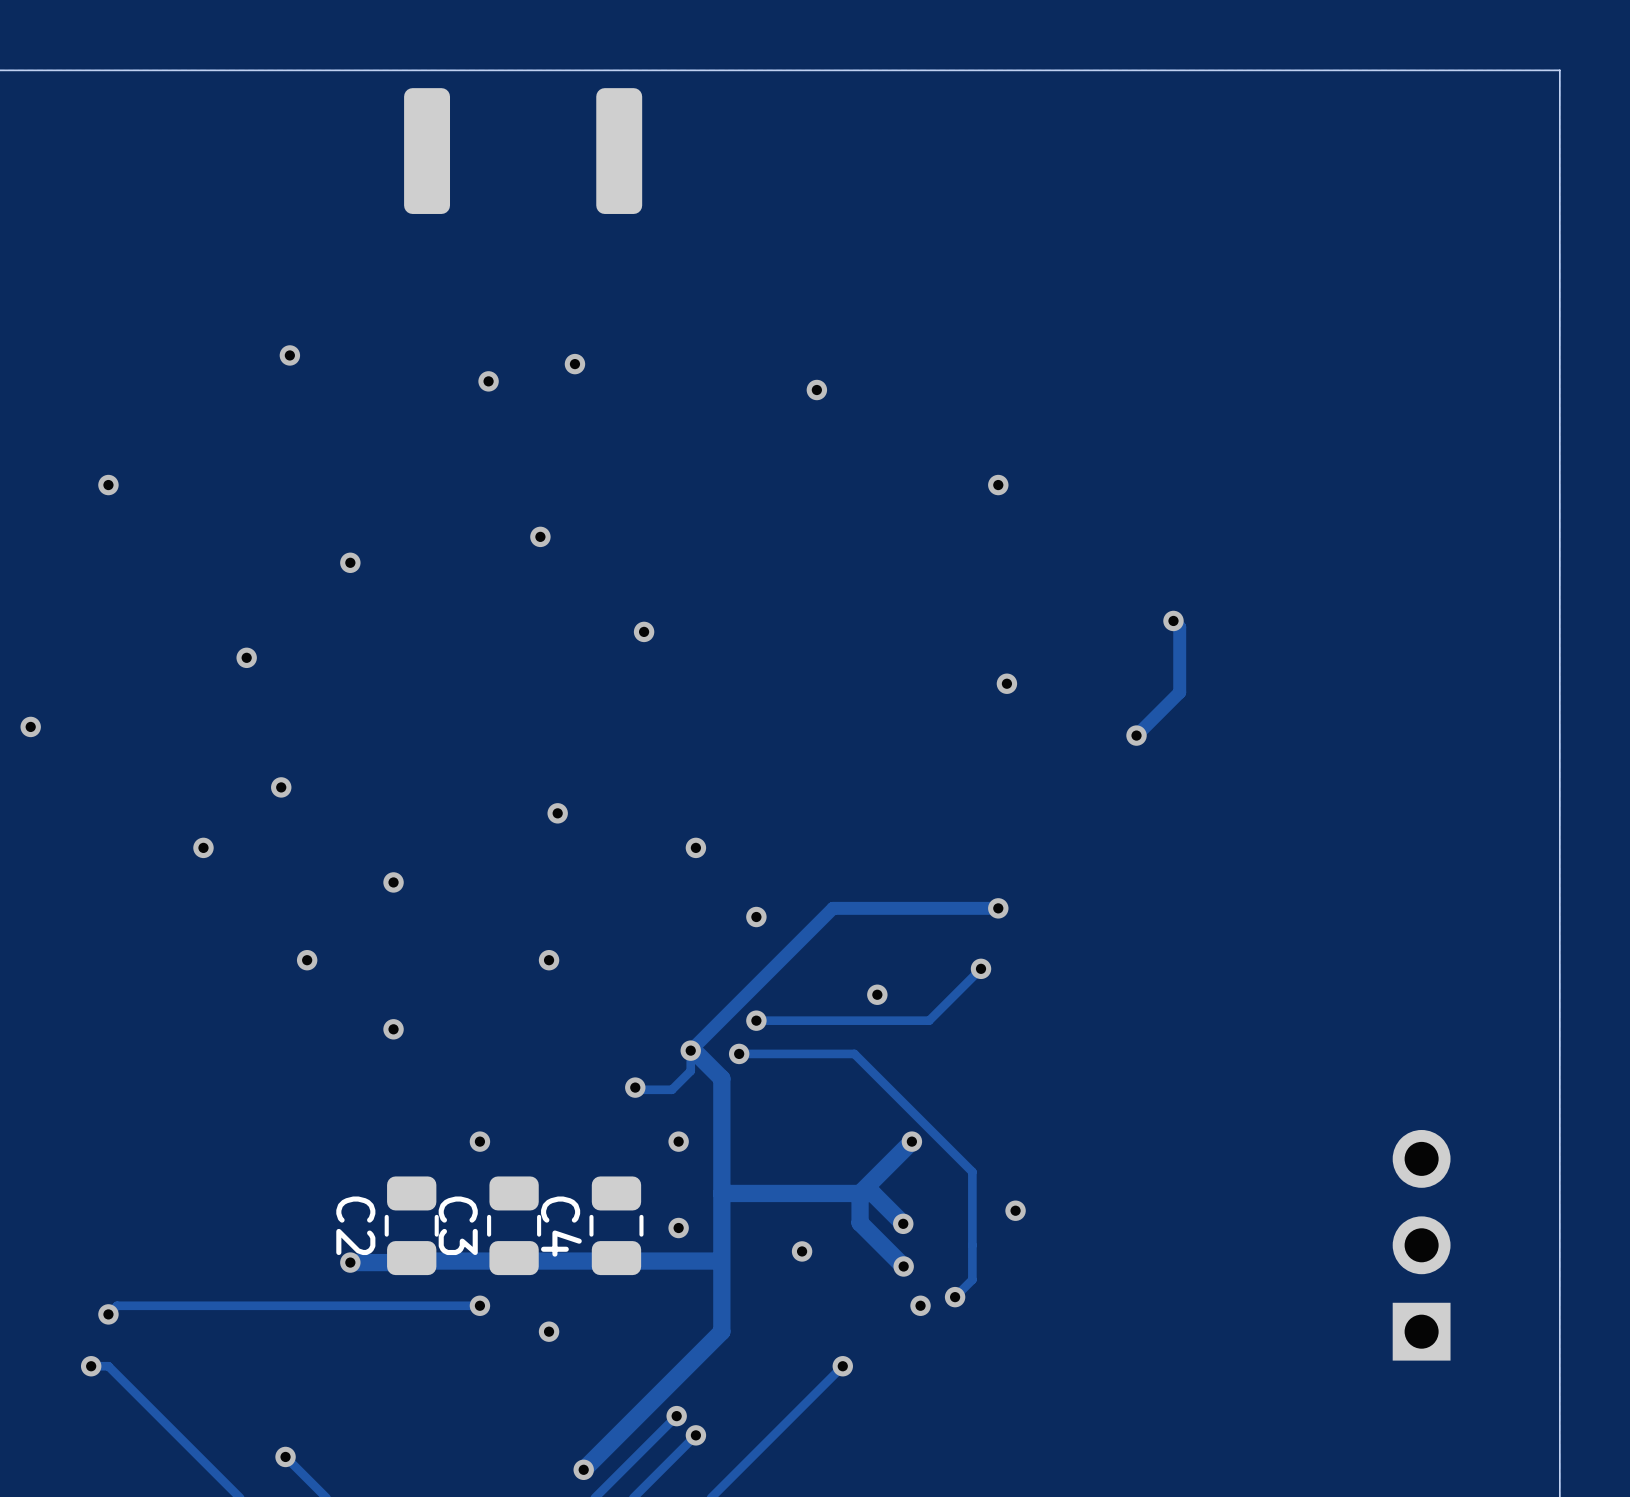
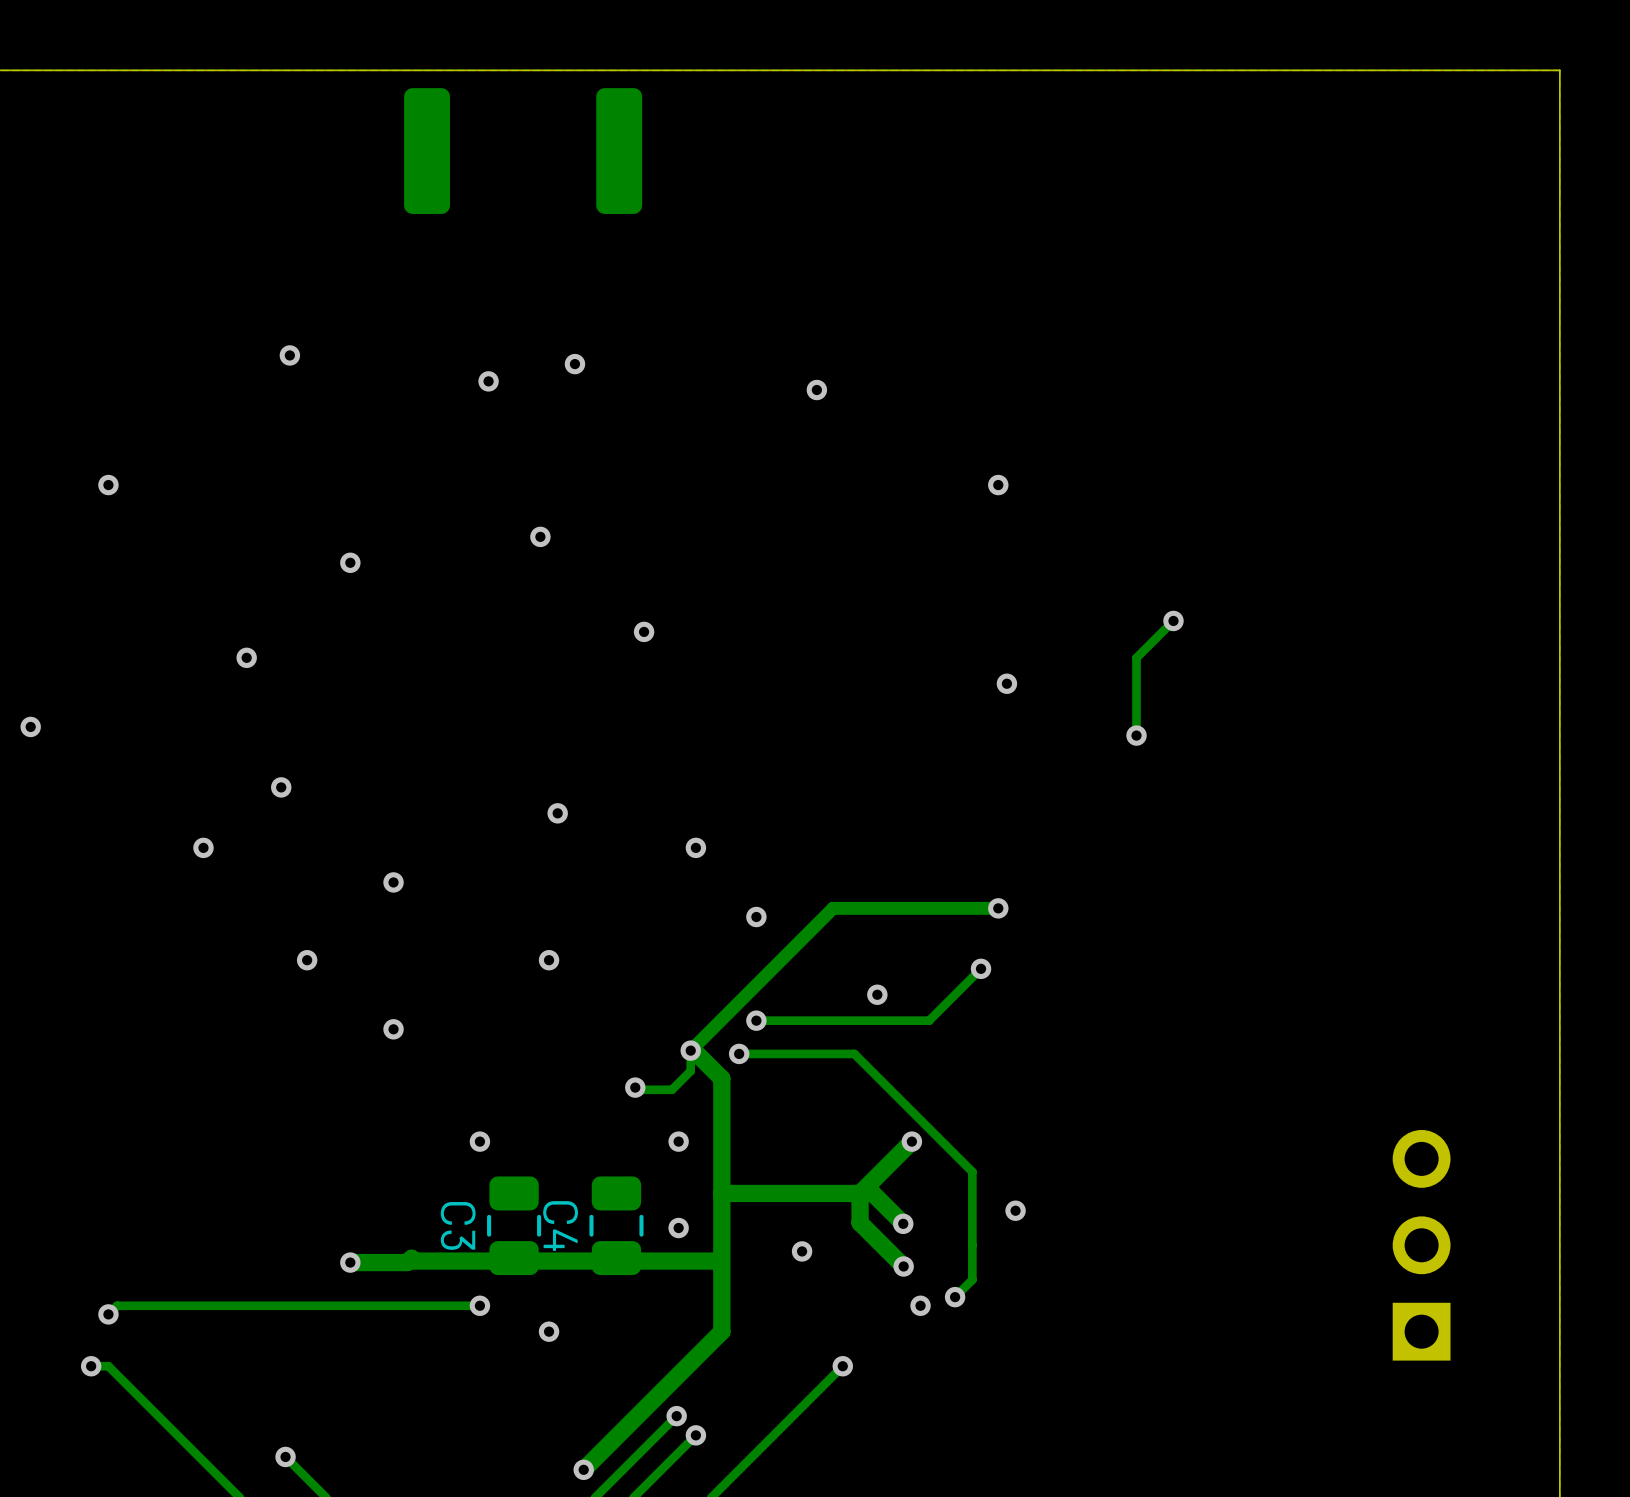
track: (1173, 620) (1179, 627) (1179, 692) (1136, 735) -> (1173, 620) (1136, 657) (1136, 735)
C2: (411, 1225) -> none

